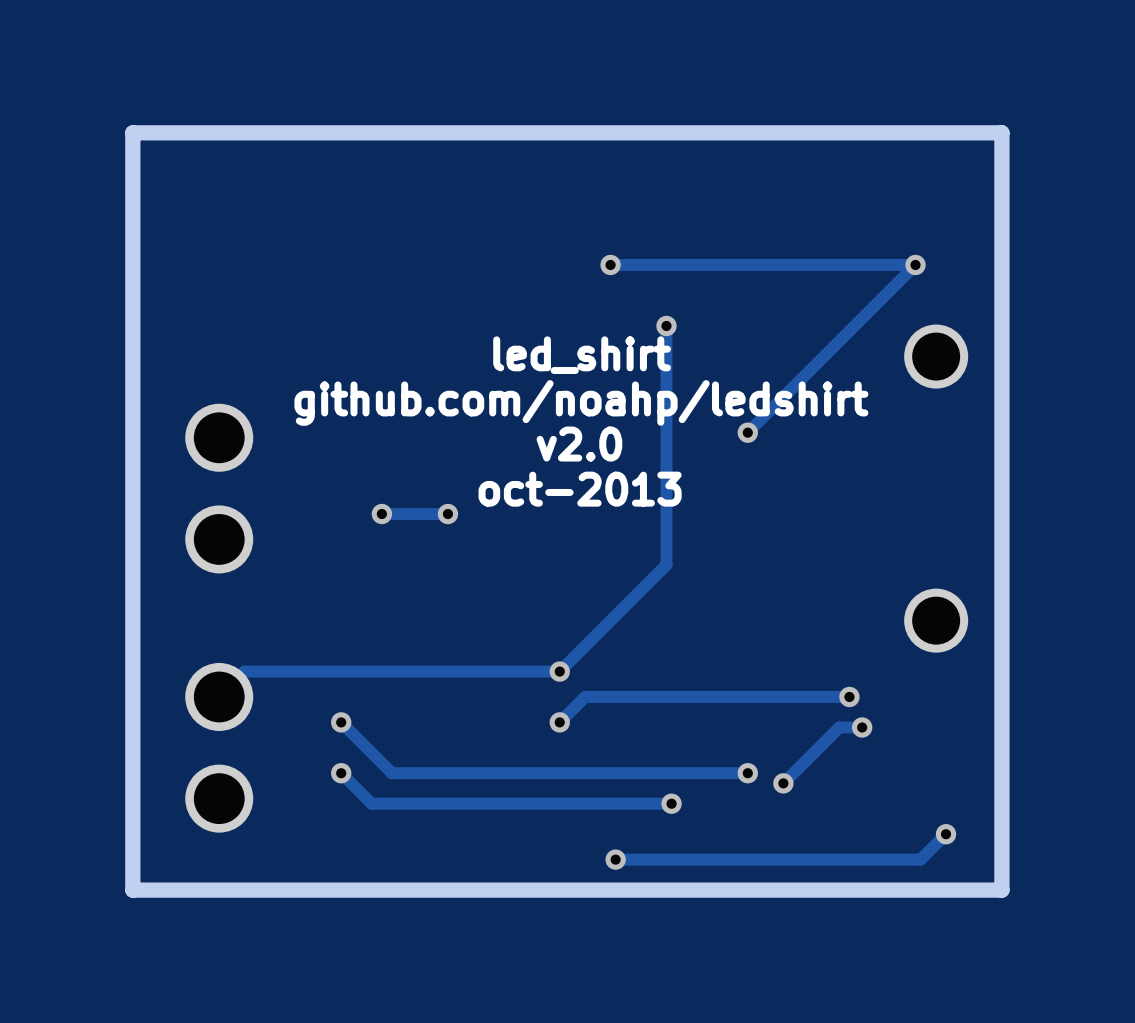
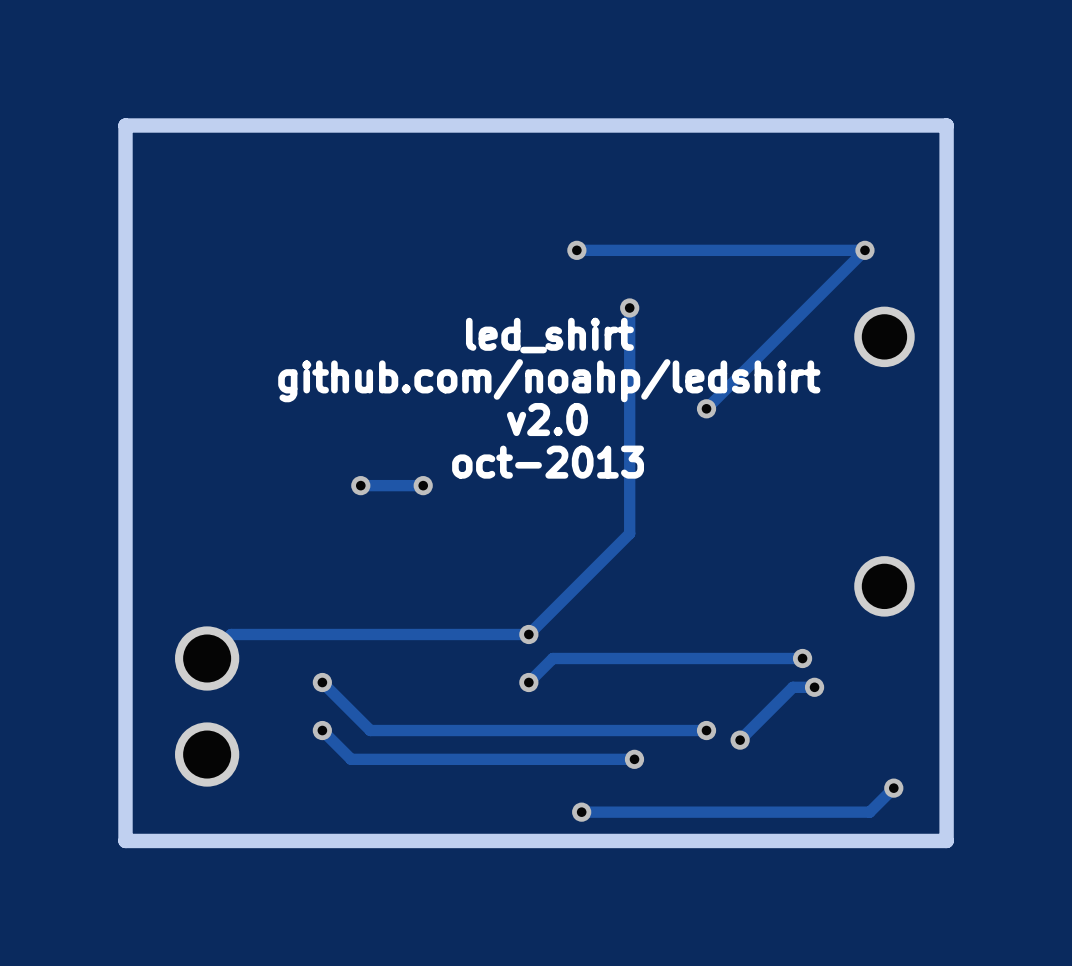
part: (219, 437) -> none
part: (219, 539) -> none

